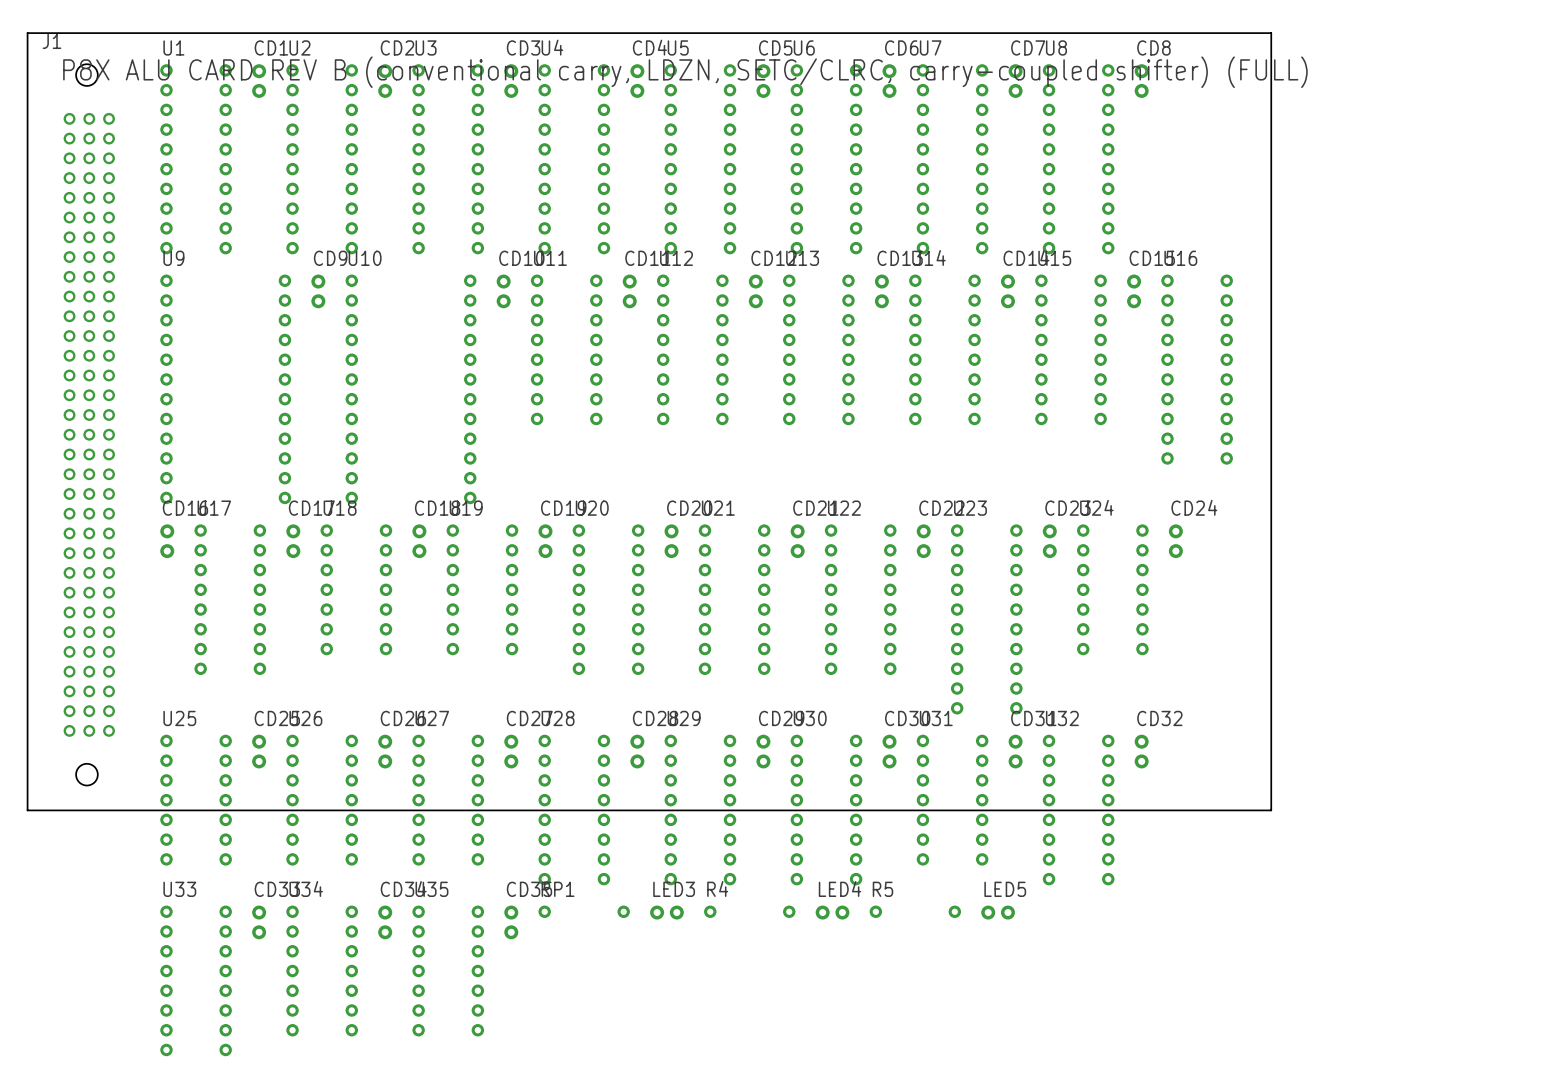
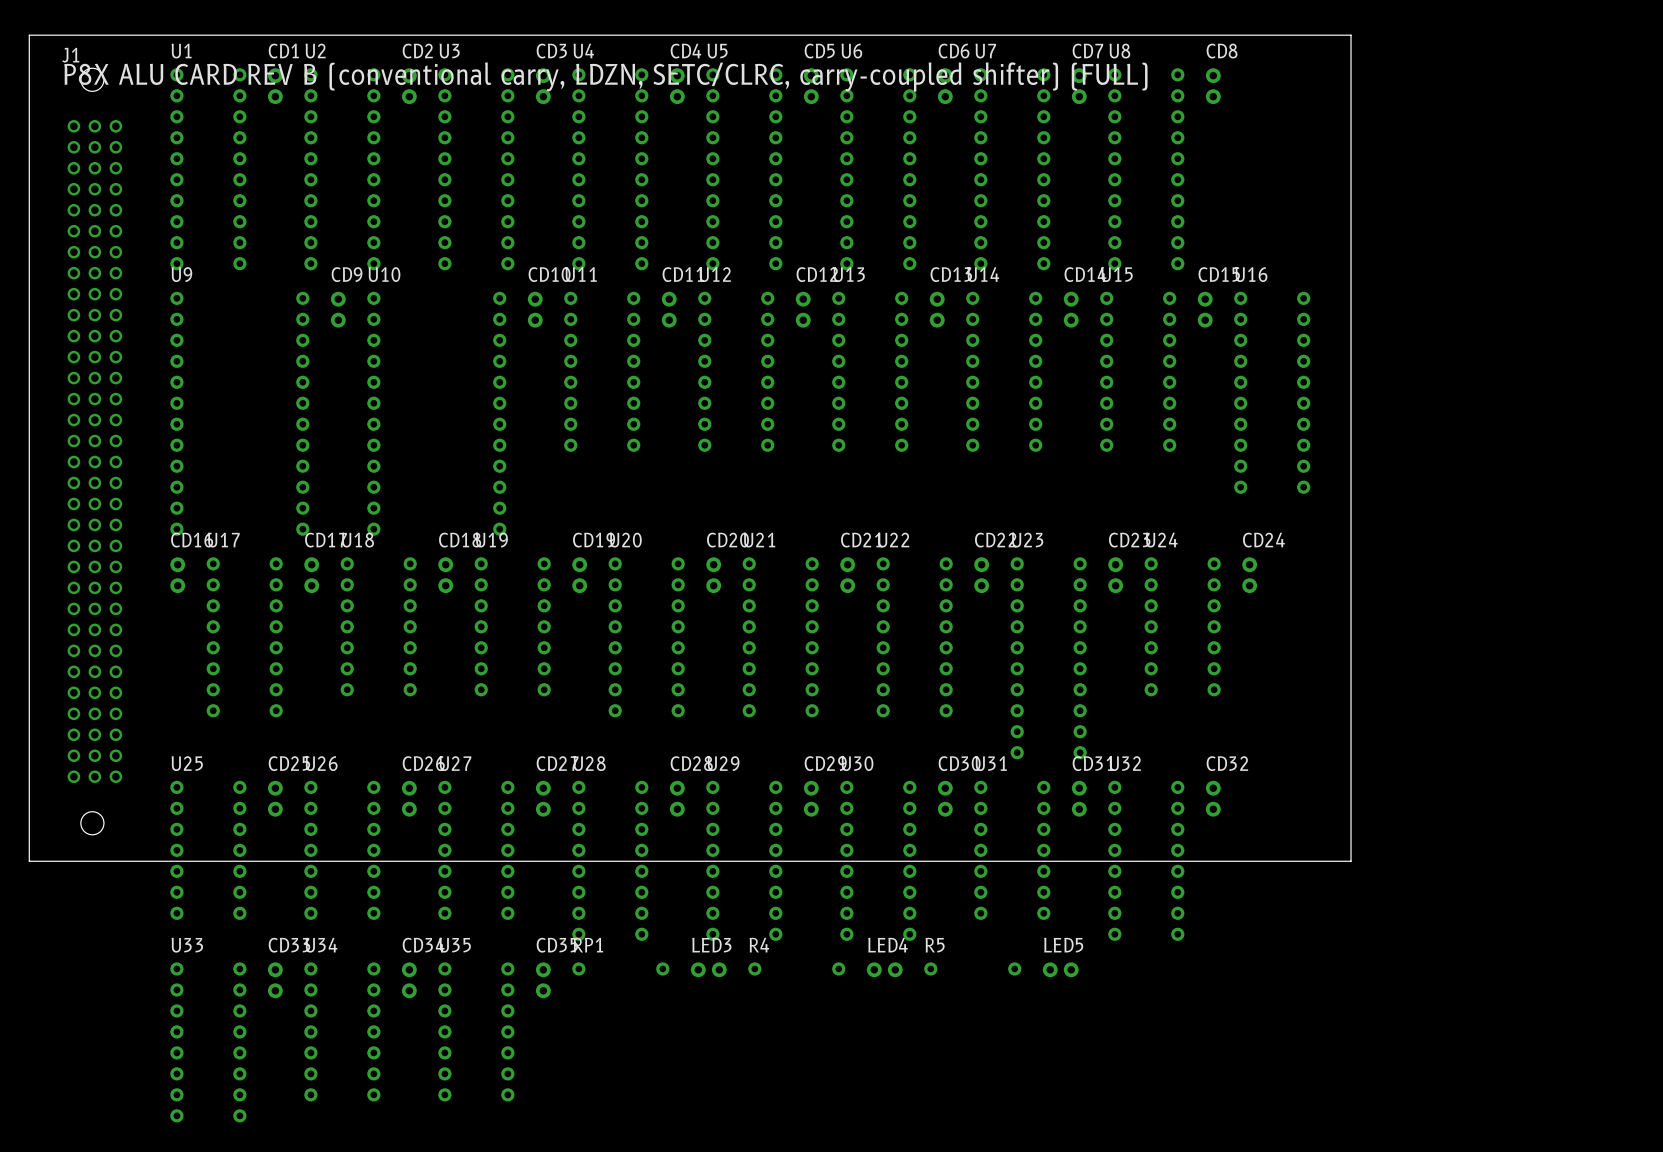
J1 name position: J1 (51, 41) -> J1 (70, 55)

